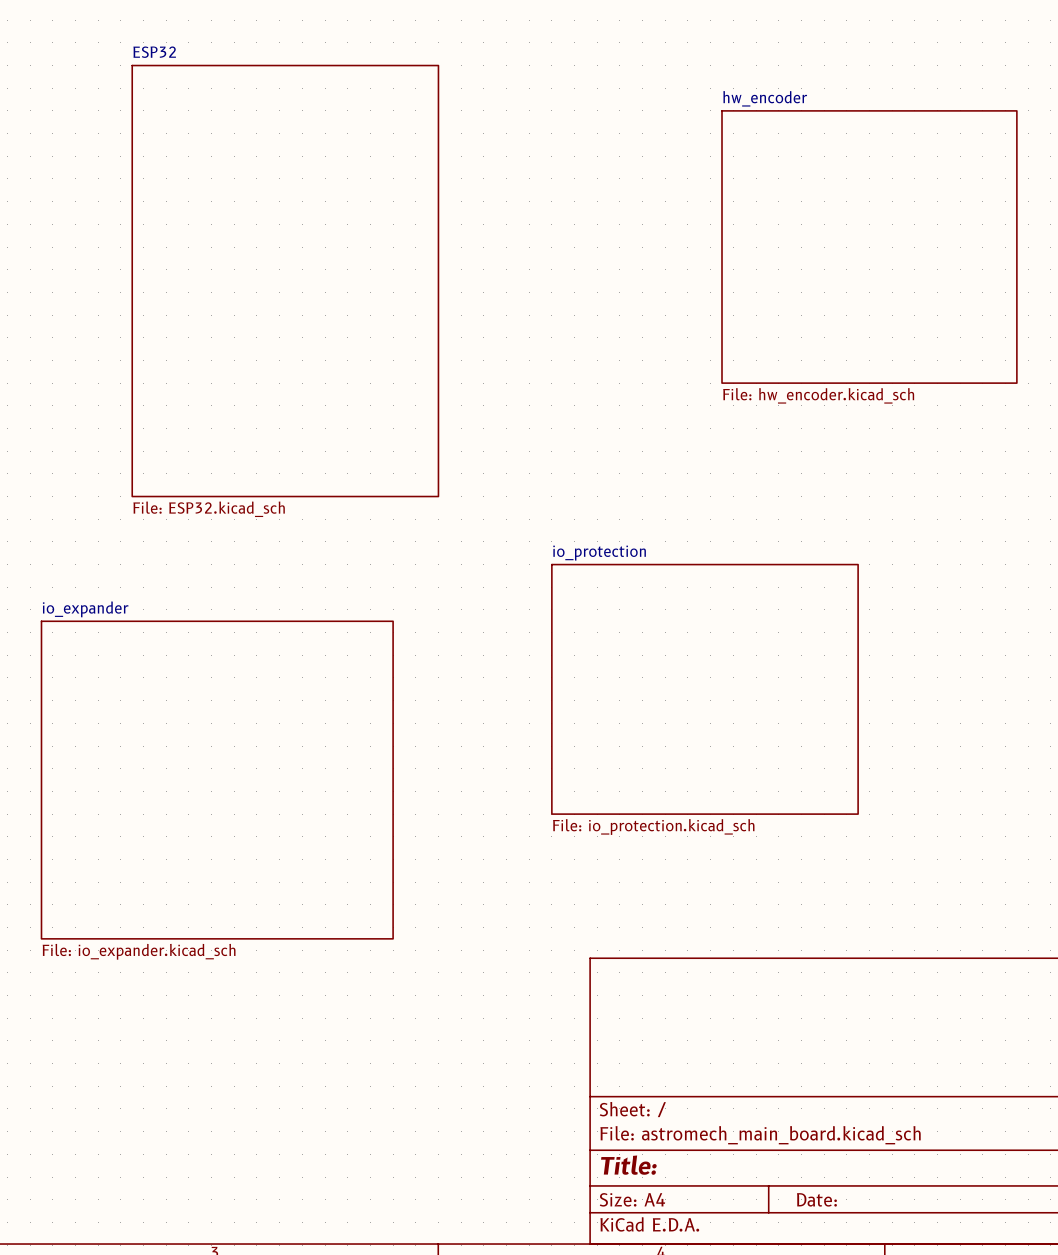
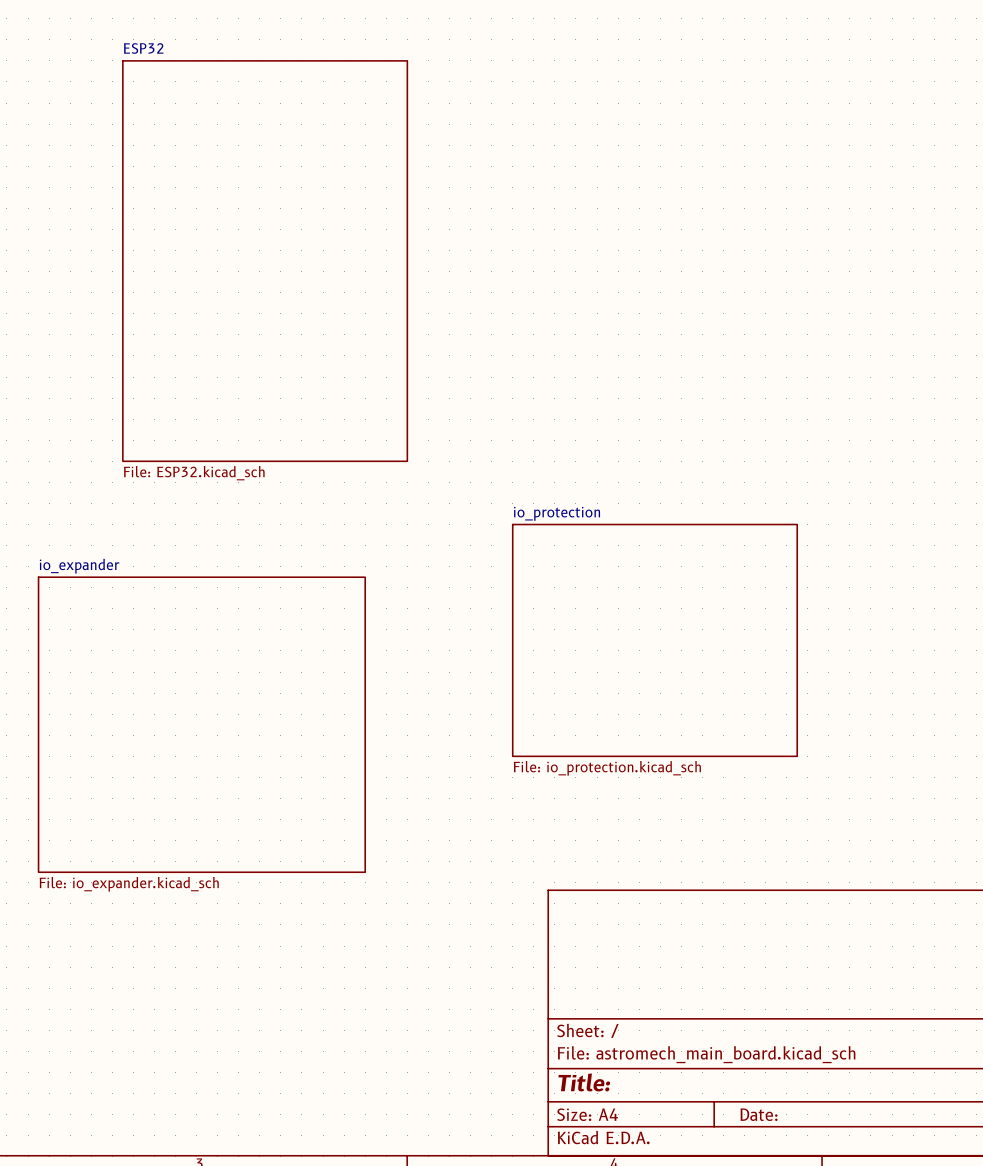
sheet hw_encoder: File: hw_encoder.kicad_sch (869, 247) -> none

